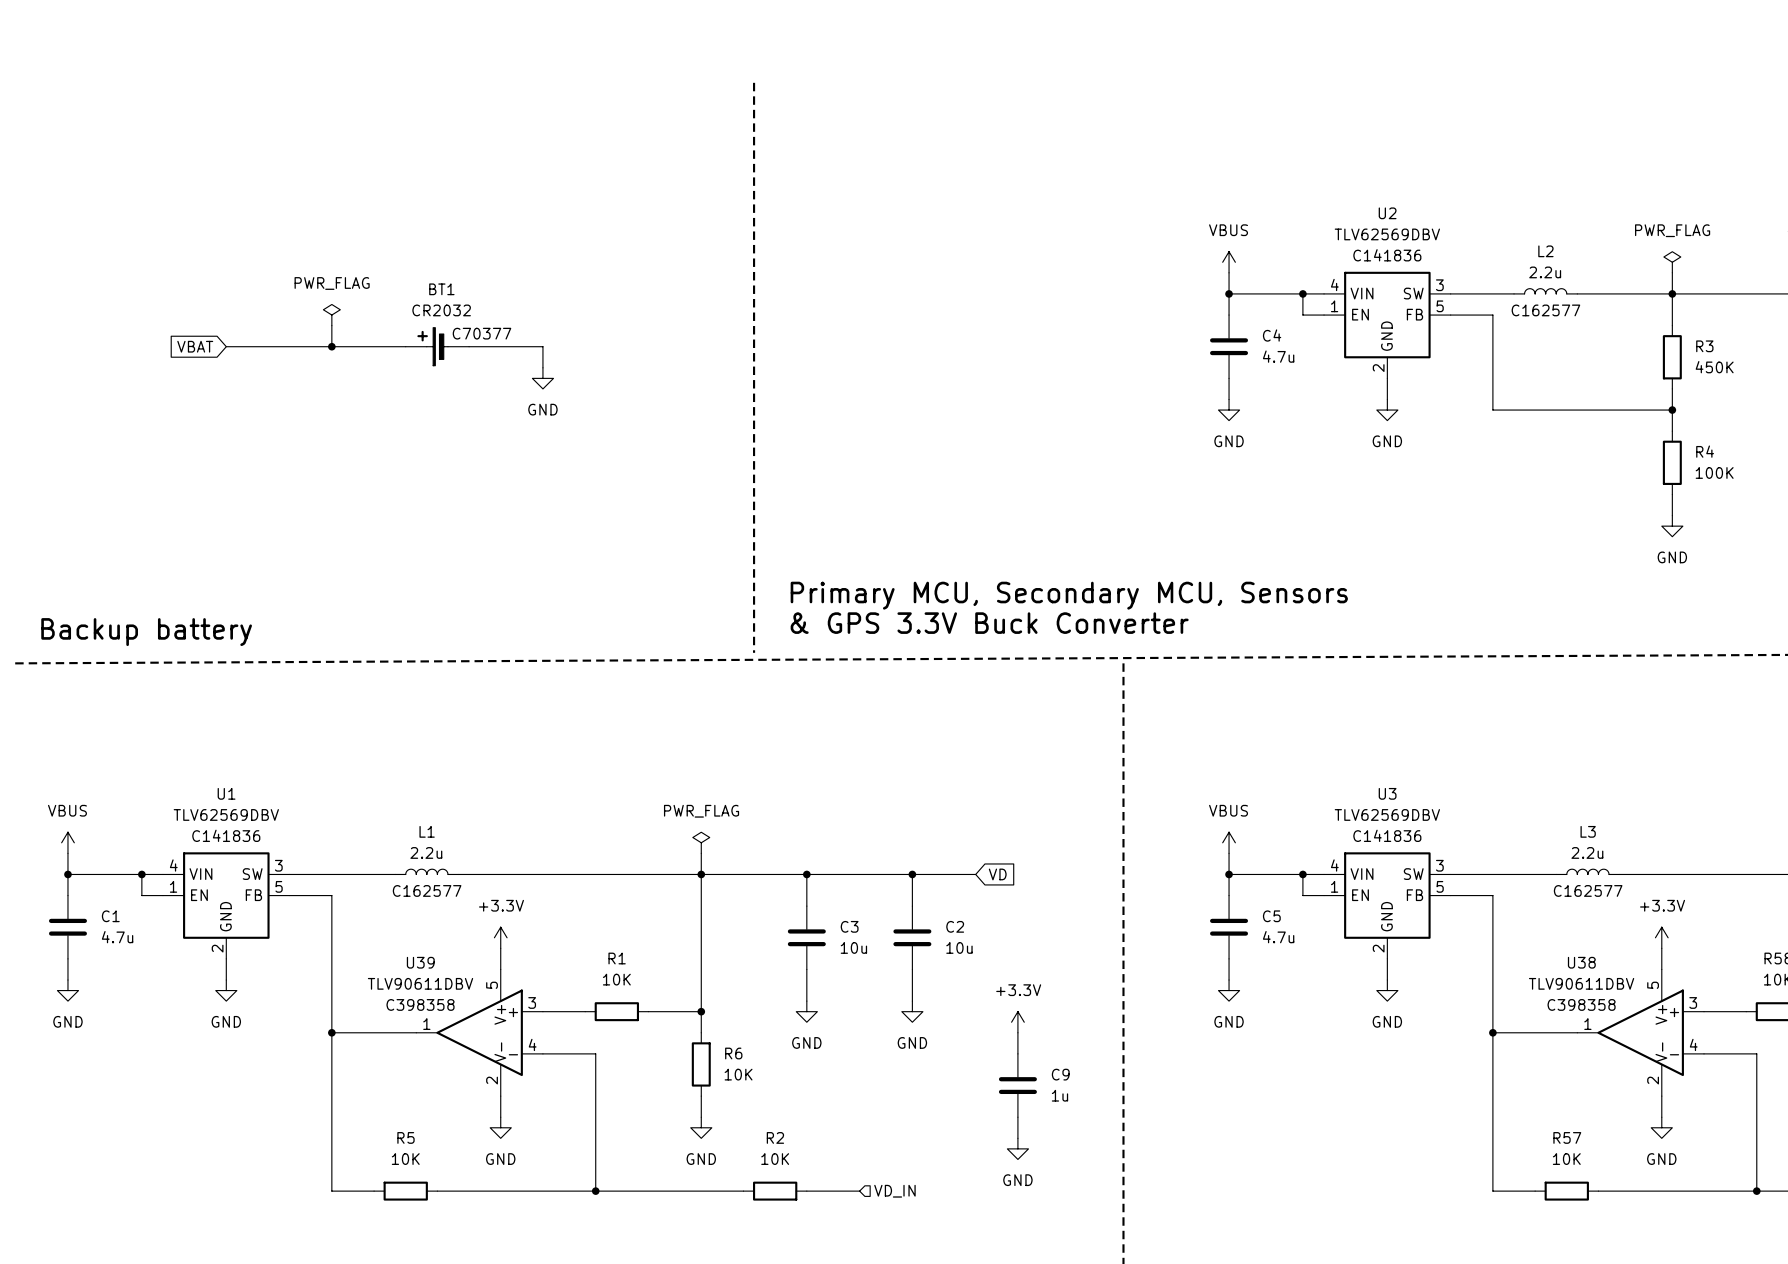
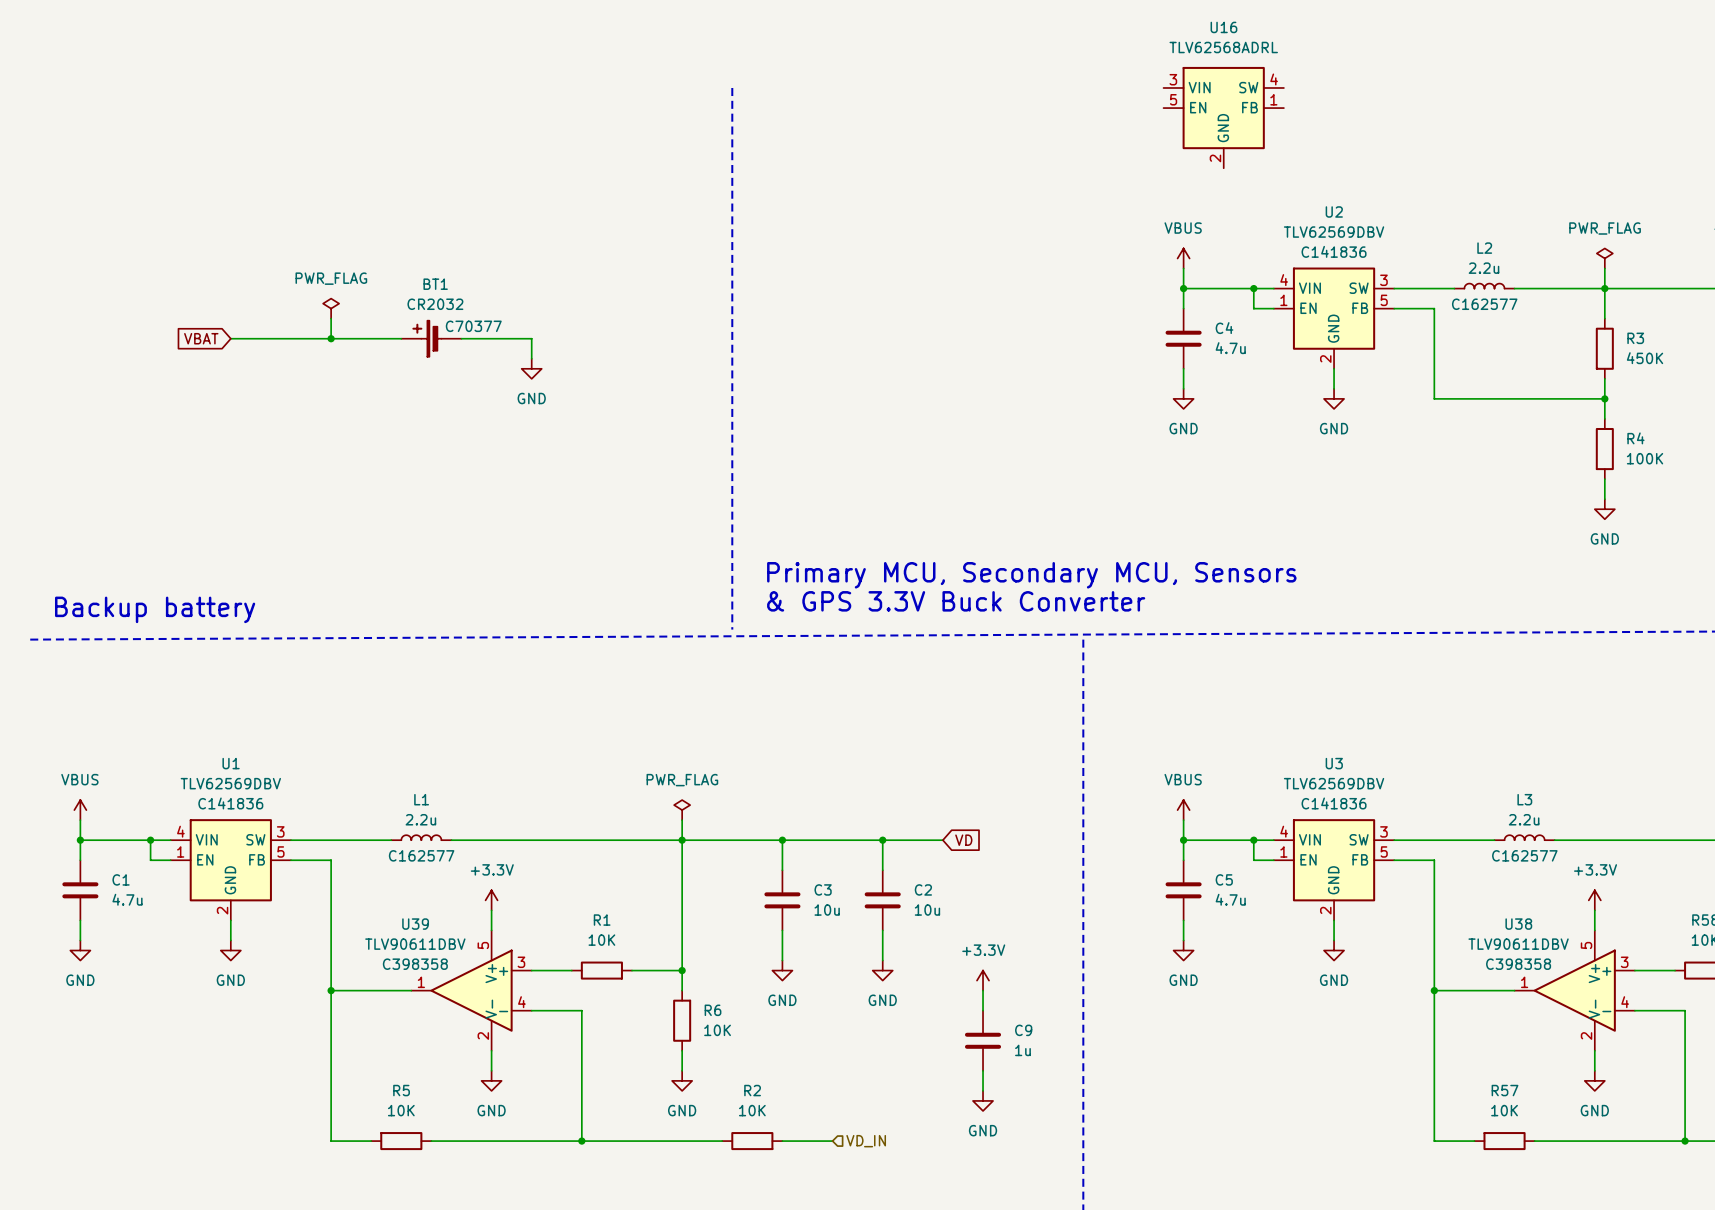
U16: none -> TLV62568ADRL (1223, 117)

